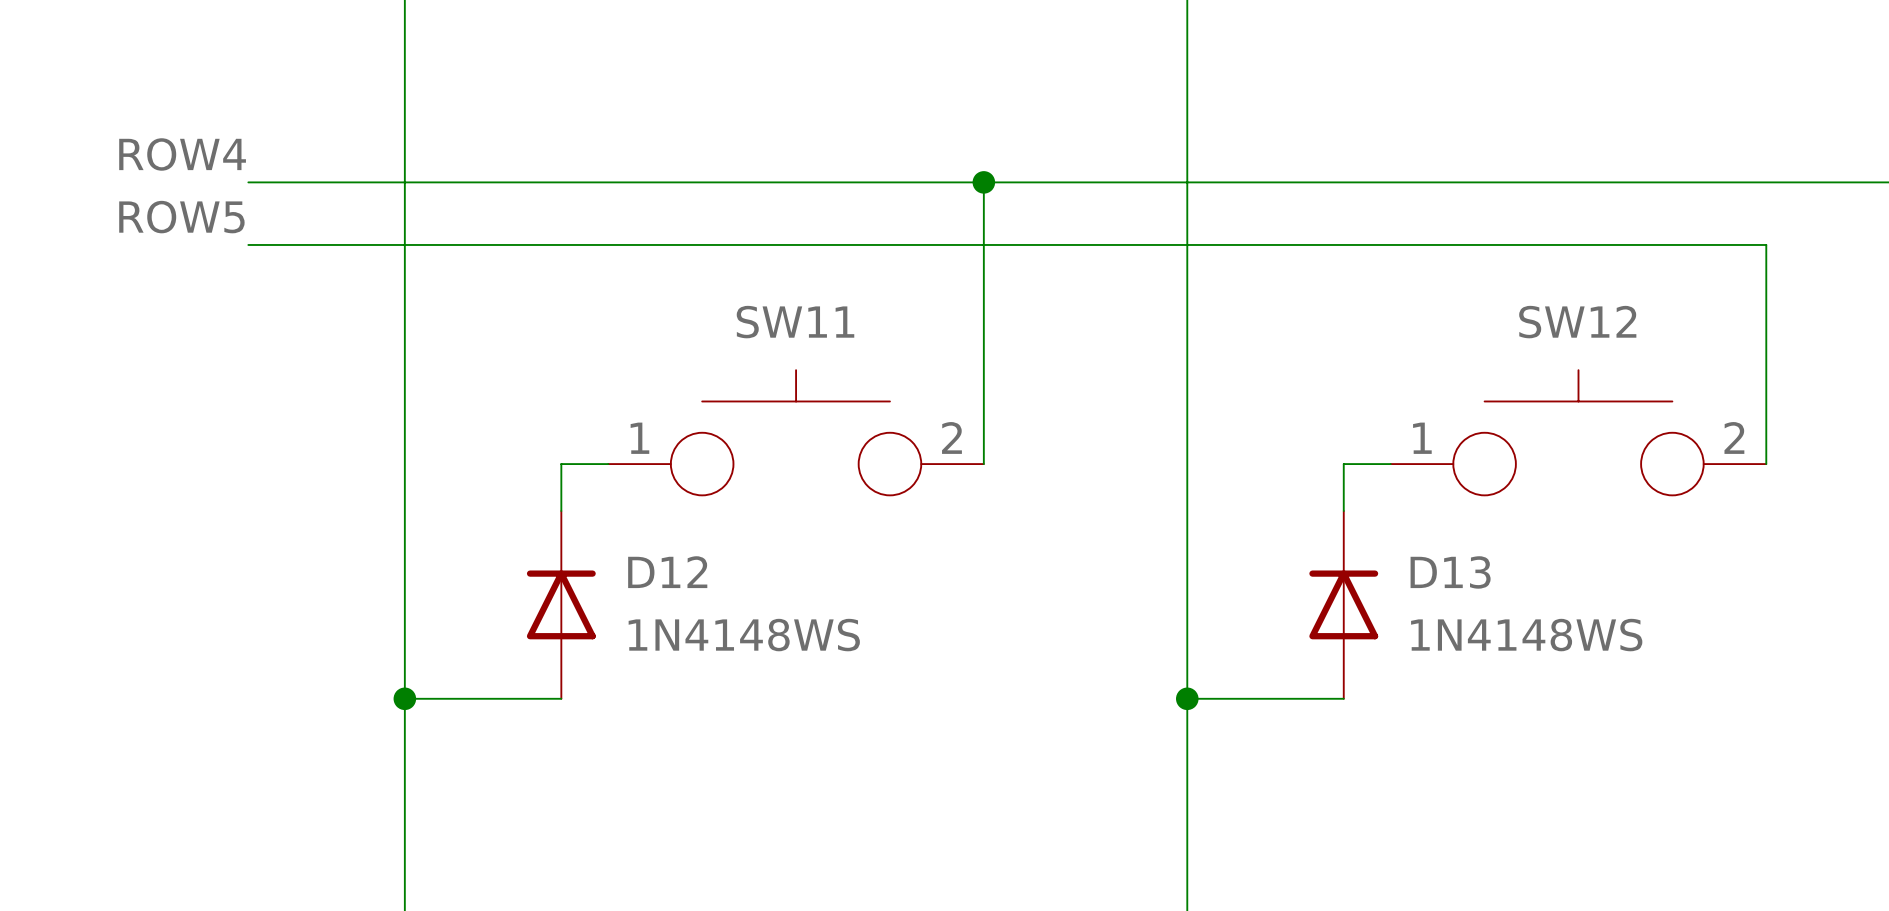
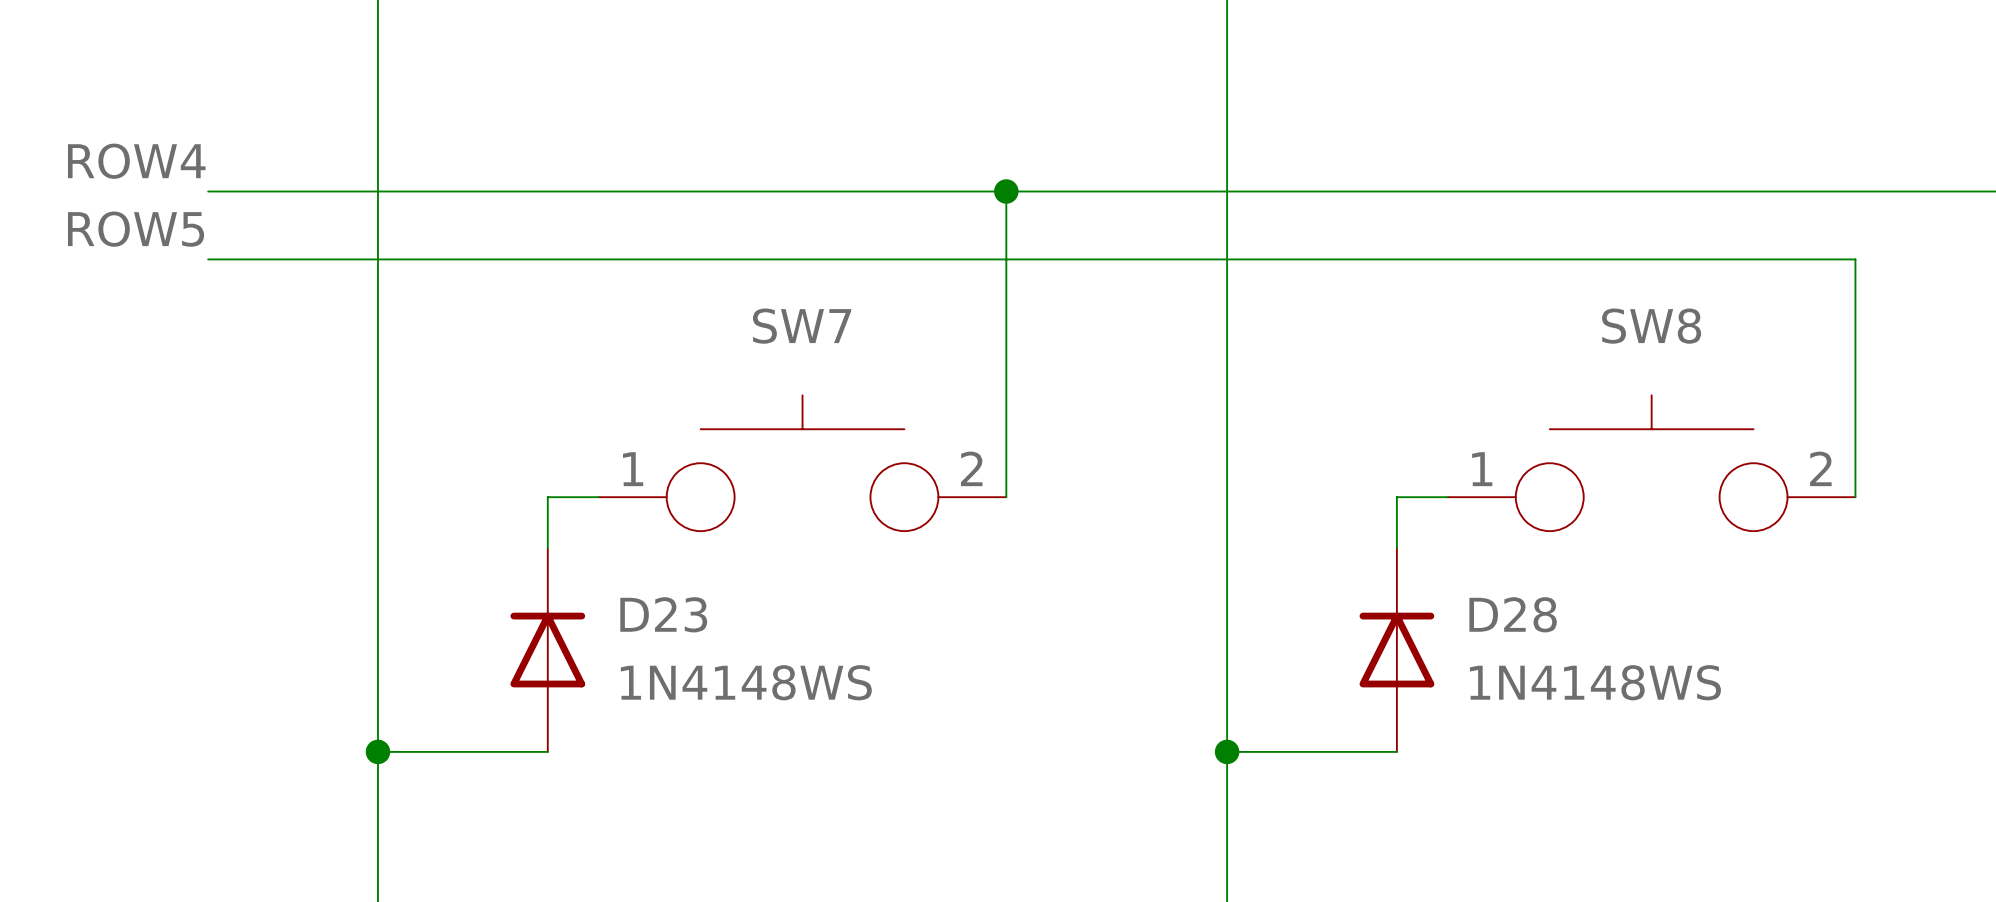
SW11 name: SW11 (795, 322) -> SW7 (802, 326)
SW12 name: SW12 (1577, 322) -> SW8 (1651, 326)
D12 name: D12 (667, 572) -> D23 (663, 614)
D13 name: D13 (1450, 572) -> D28 (1513, 614)

